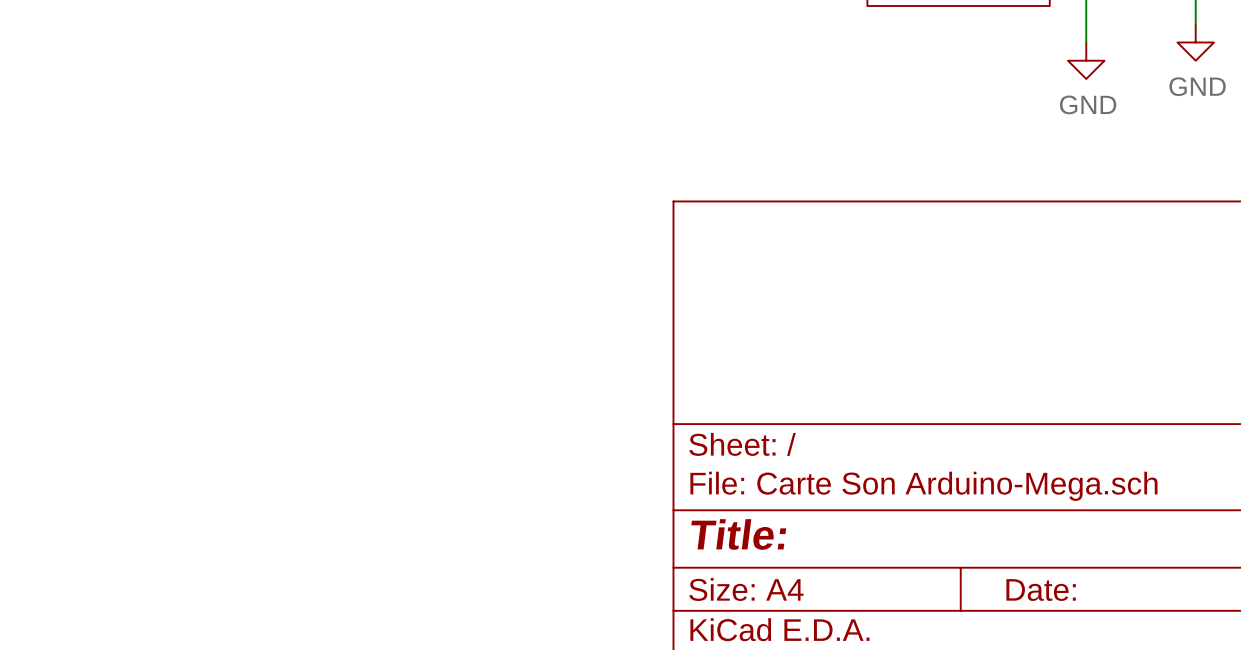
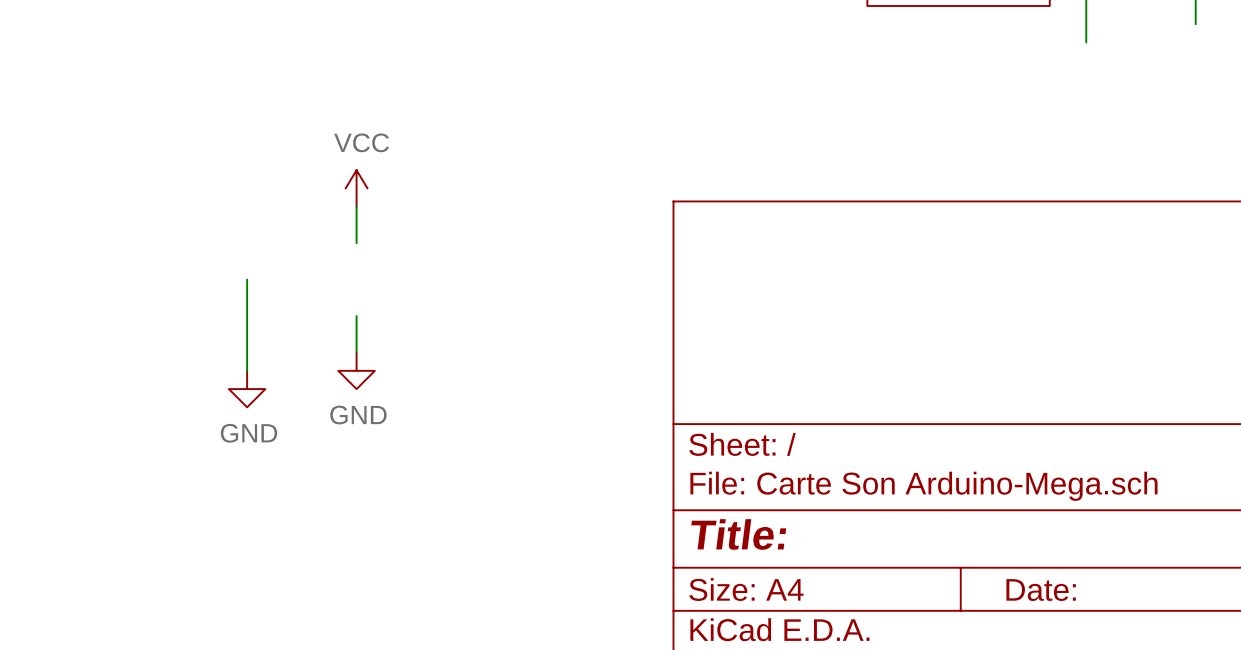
power symbol: GND (1195, 42) -> none
power symbol: GND (1086, 60) -> none
power symbol: none -> VCC (356, 188)
wire: none -> (356, 206) (356, 243)
wire: none -> (247, 279) (247, 370)
wire: none -> (356, 316) (356, 352)
power symbol: none -> GND (356, 370)
power symbol: none -> GND (247, 389)

